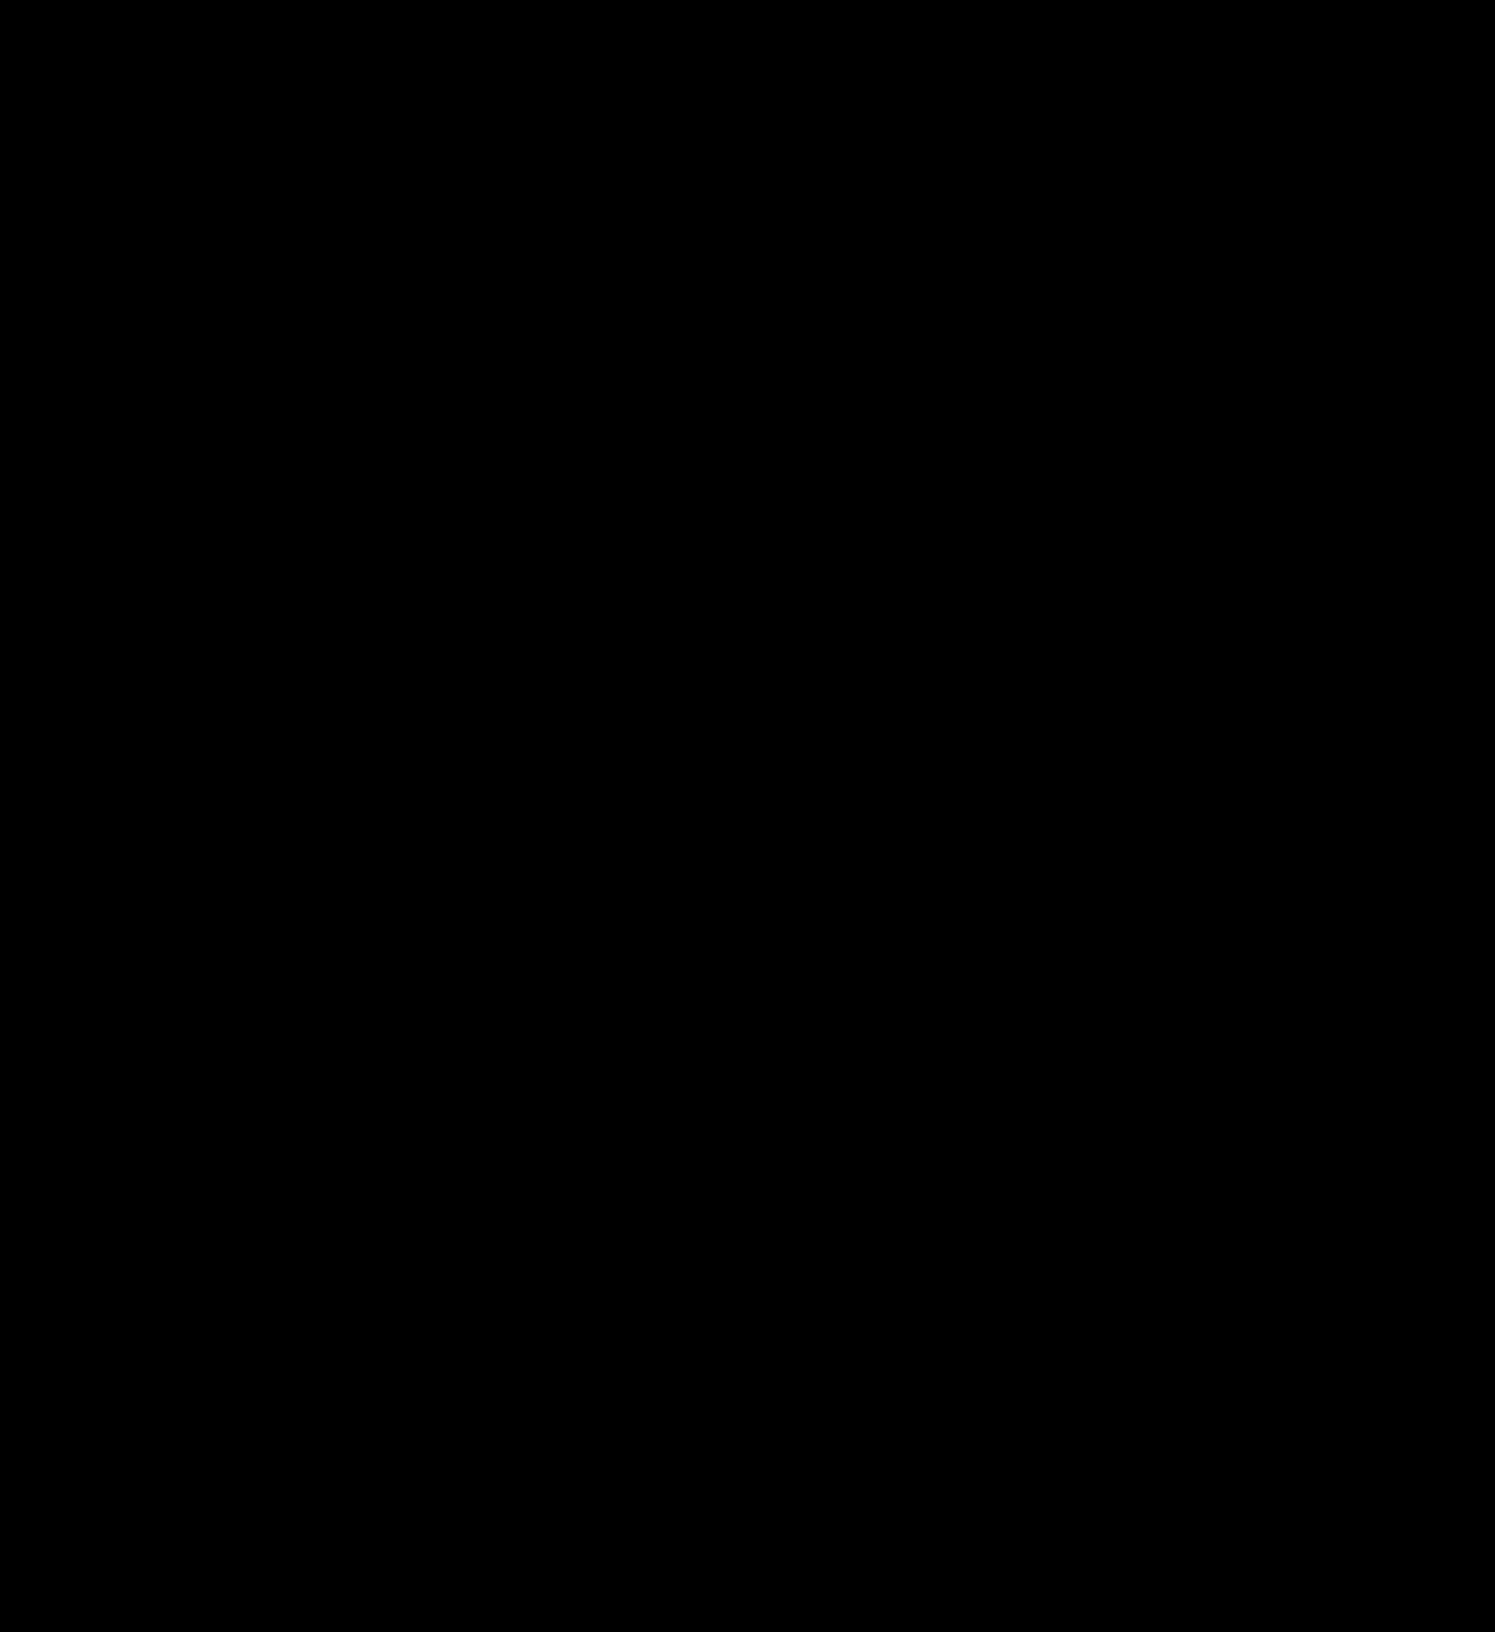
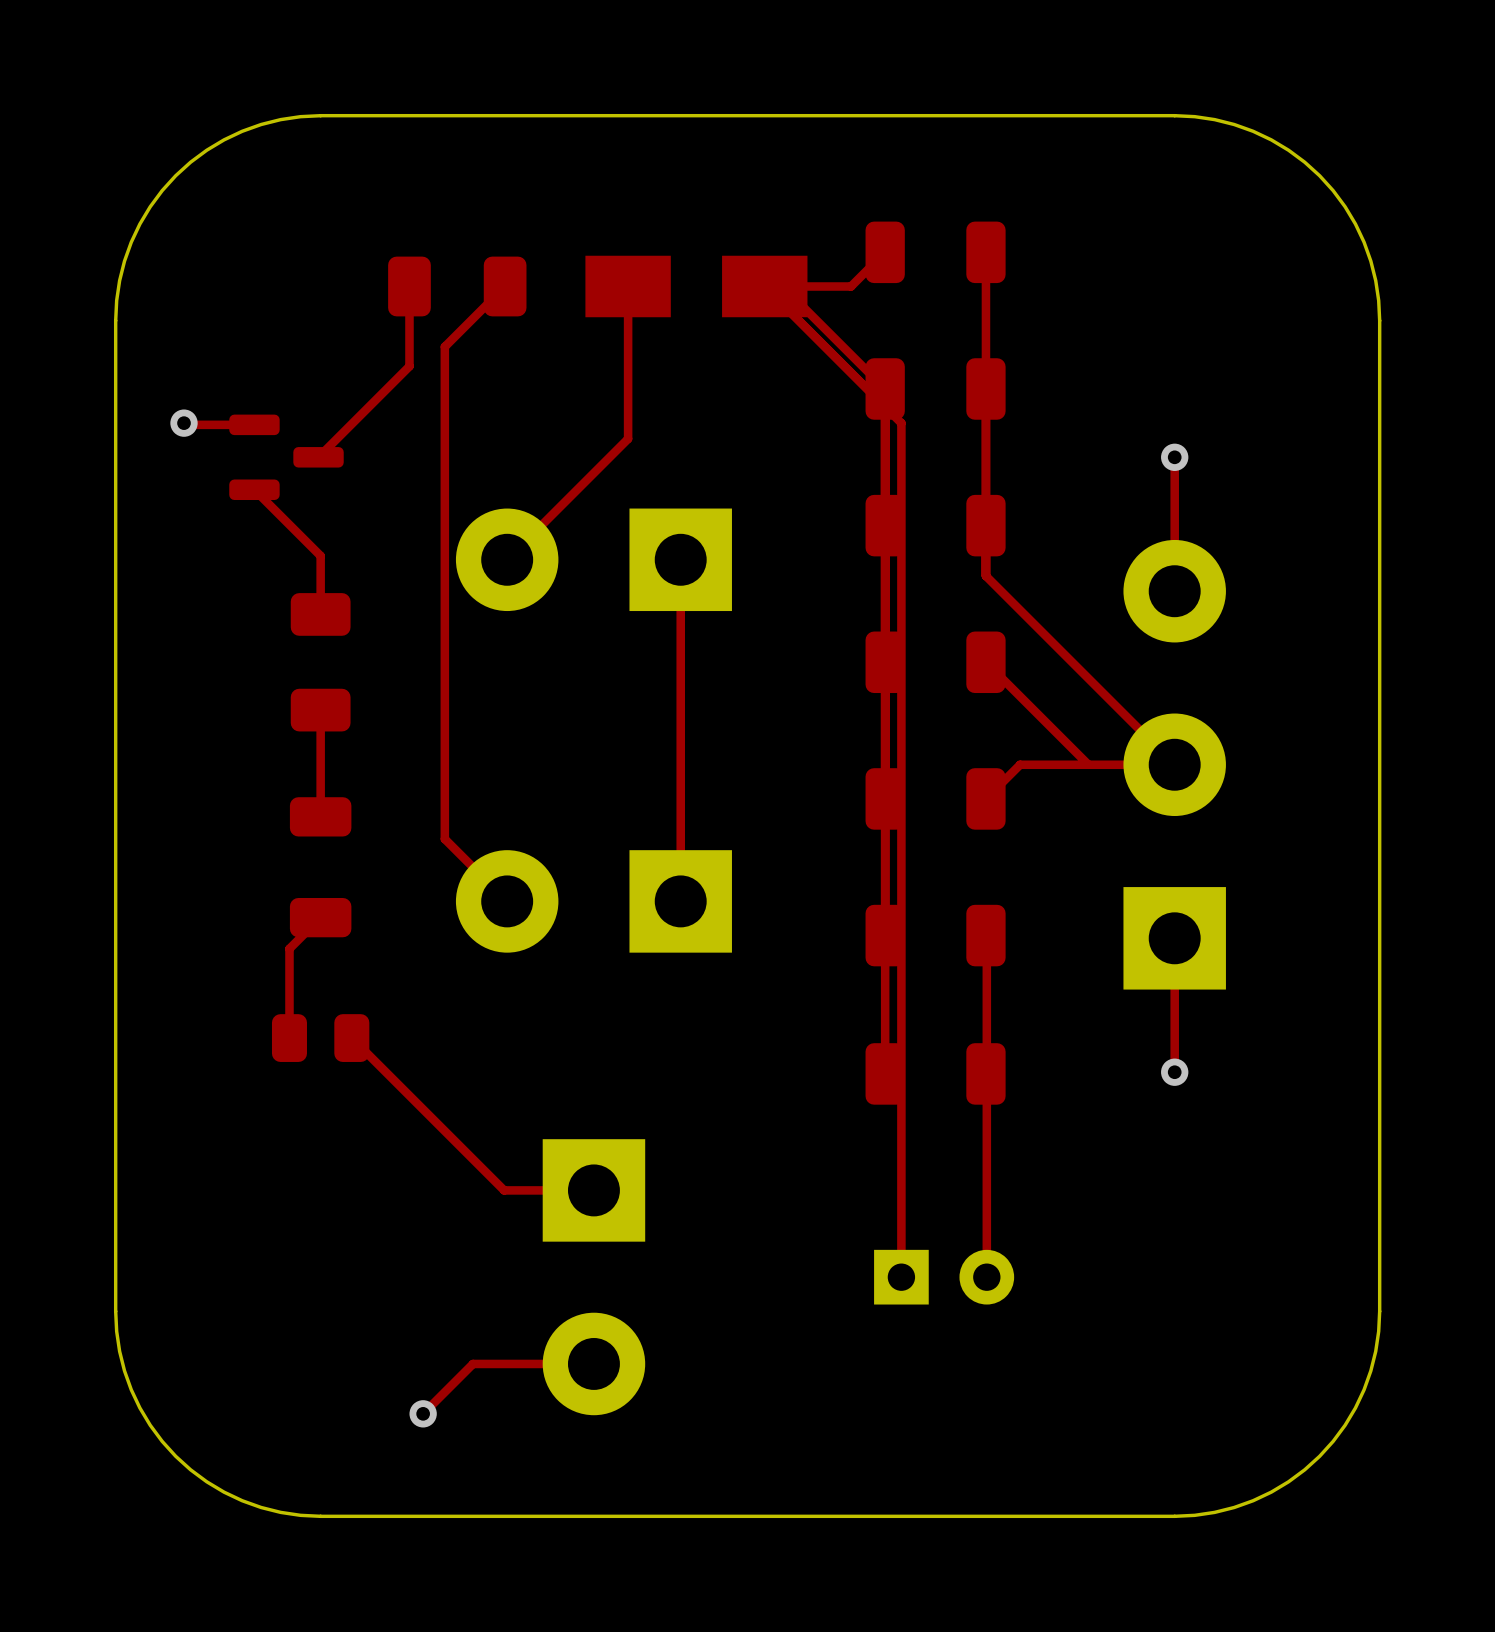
board edge: none -> (1174, 115) (300, 116) (280, 119) (242, 131) (206, 150) (175, 175) (150, 206) (131, 242) (124, 261) (116, 300) (115, 320) (115, 1311) (119, 1351) (124, 1370) (139, 1407) (162, 1441) (175, 1456) (206, 1481) (224, 1492) (261, 1507) (280, 1512) (320, 1516) (1194, 1515) (1234, 1507) (1271, 1492) (1304, 1469) (1319, 1456) (1345, 1425) (1364, 1389) (1370, 1370) (1378, 1331) (1379, 1311) (1378, 300) (1370, 261) (1355, 224) (1333, 190) (1304, 162) (1271, 139) (1234, 124) (1194, 116) (1174, 115)
top track: none -> (885, 252) (851, 286) (764, 286) (901, 423) (901, 1277)
part: none -> (935, 252)
top track: none -> (985, 252) (985, 576) (1174, 764) (1020, 764) (985, 798)
top track: none -> (409, 286) (409, 366) (318, 457)
part: none -> (457, 286)
top track: none -> (505, 286) (444, 346) (444, 839) (507, 901)
top track: none -> (628, 286) (628, 438) (507, 559)
part: none -> (696, 286)
top track: none -> (782, 286) (885, 388)
part: none -> (935, 388)
top track: none -> (885, 406) (885, 1073)
top track: none -> (184, 423) (185, 424) (254, 424)
via: none -> (184, 423)
part: none -> (286, 457)
top track: none -> (1174, 457) (1174, 591)
via: none -> (1174, 457)
top track: none -> (254, 489) (320, 555) (320, 614)
part: none -> (935, 525)
part: none -> (593, 559)
top track: none -> (680, 559) (680, 901)
part: none -> (320, 662)
part: none -> (935, 662)
top track: none -> (985, 662) (1088, 764)
top track: none -> (320, 710) (320, 816)
part: none -> (1174, 764)
part: none -> (935, 798)
part: none -> (320, 867)
part: none -> (593, 901)
top track: none -> (320, 917) (289, 948) (289, 1038)
part: none -> (935, 935)
top track: none -> (1174, 938) (1174, 1072)
top track: none -> (986, 952) (986, 1277)
part: none -> (320, 1038)
top track: none -> (351, 1038) (504, 1190) (593, 1190)
via: none -> (1174, 1072)
part: none -> (935, 1073)
part: none -> (593, 1277)
part: none -> (944, 1277)
top track: none -> (593, 1363) (473, 1363) (423, 1413)
via: none -> (423, 1413)

